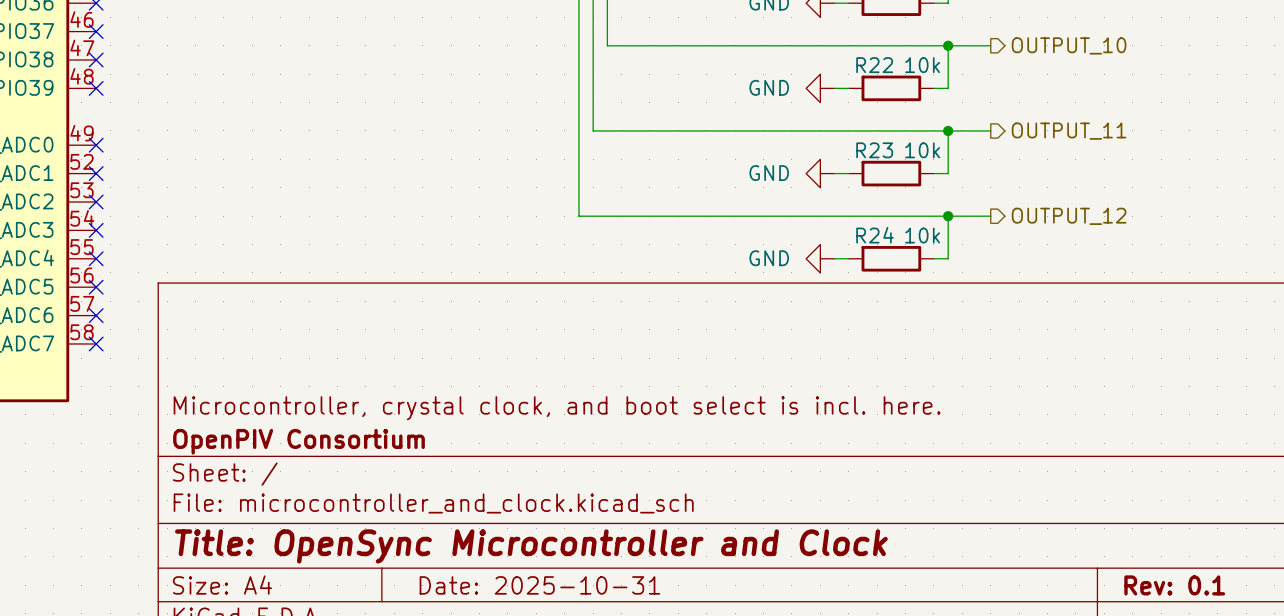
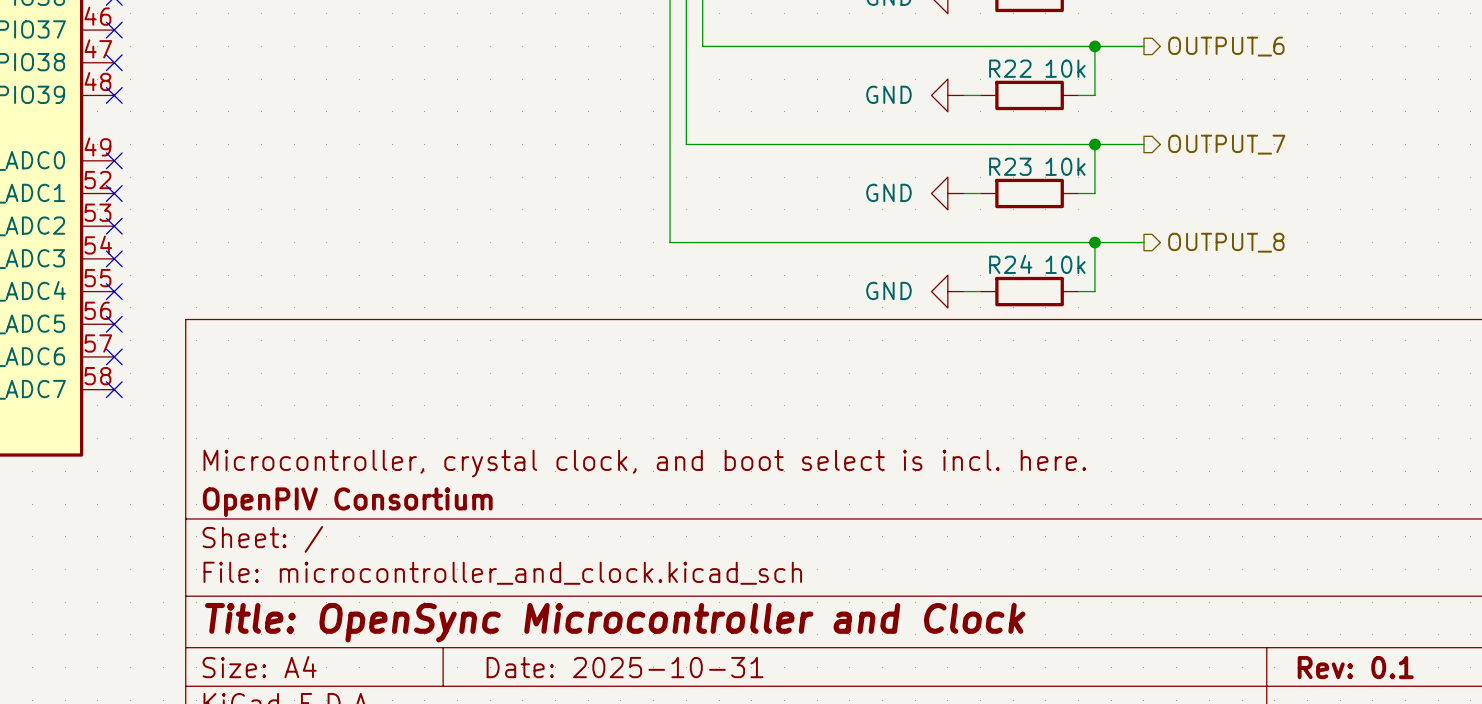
hierarchical label: OUTPUT_10 (1069, 45) -> OUTPUT_6 (1226, 46)
hierarchical label: OUTPUT_11 (1069, 131) -> OUTPUT_7 (1226, 144)
hierarchical label: OUTPUT_12 (1069, 216) -> OUTPUT_8 (1226, 242)

